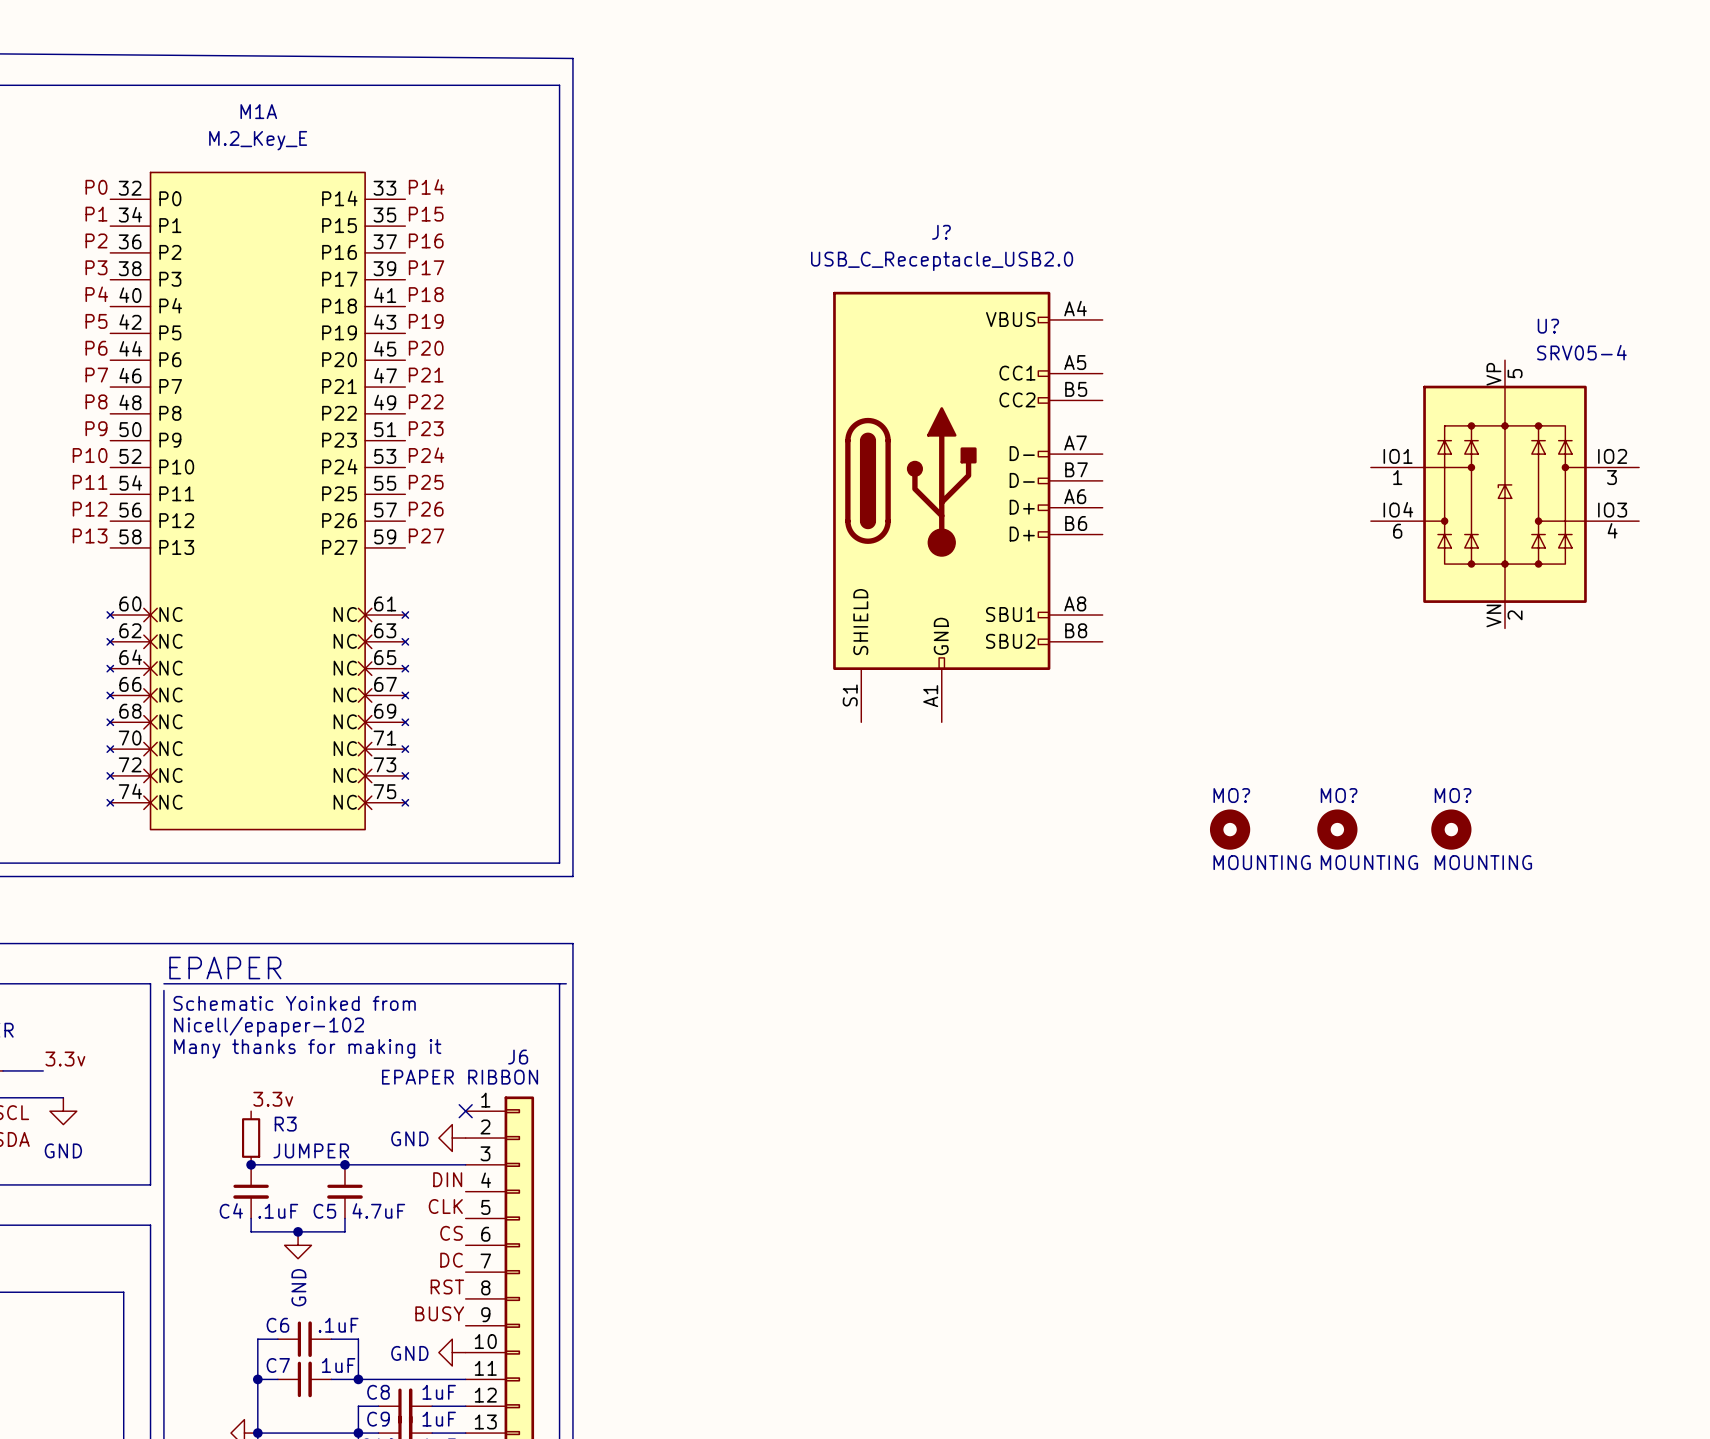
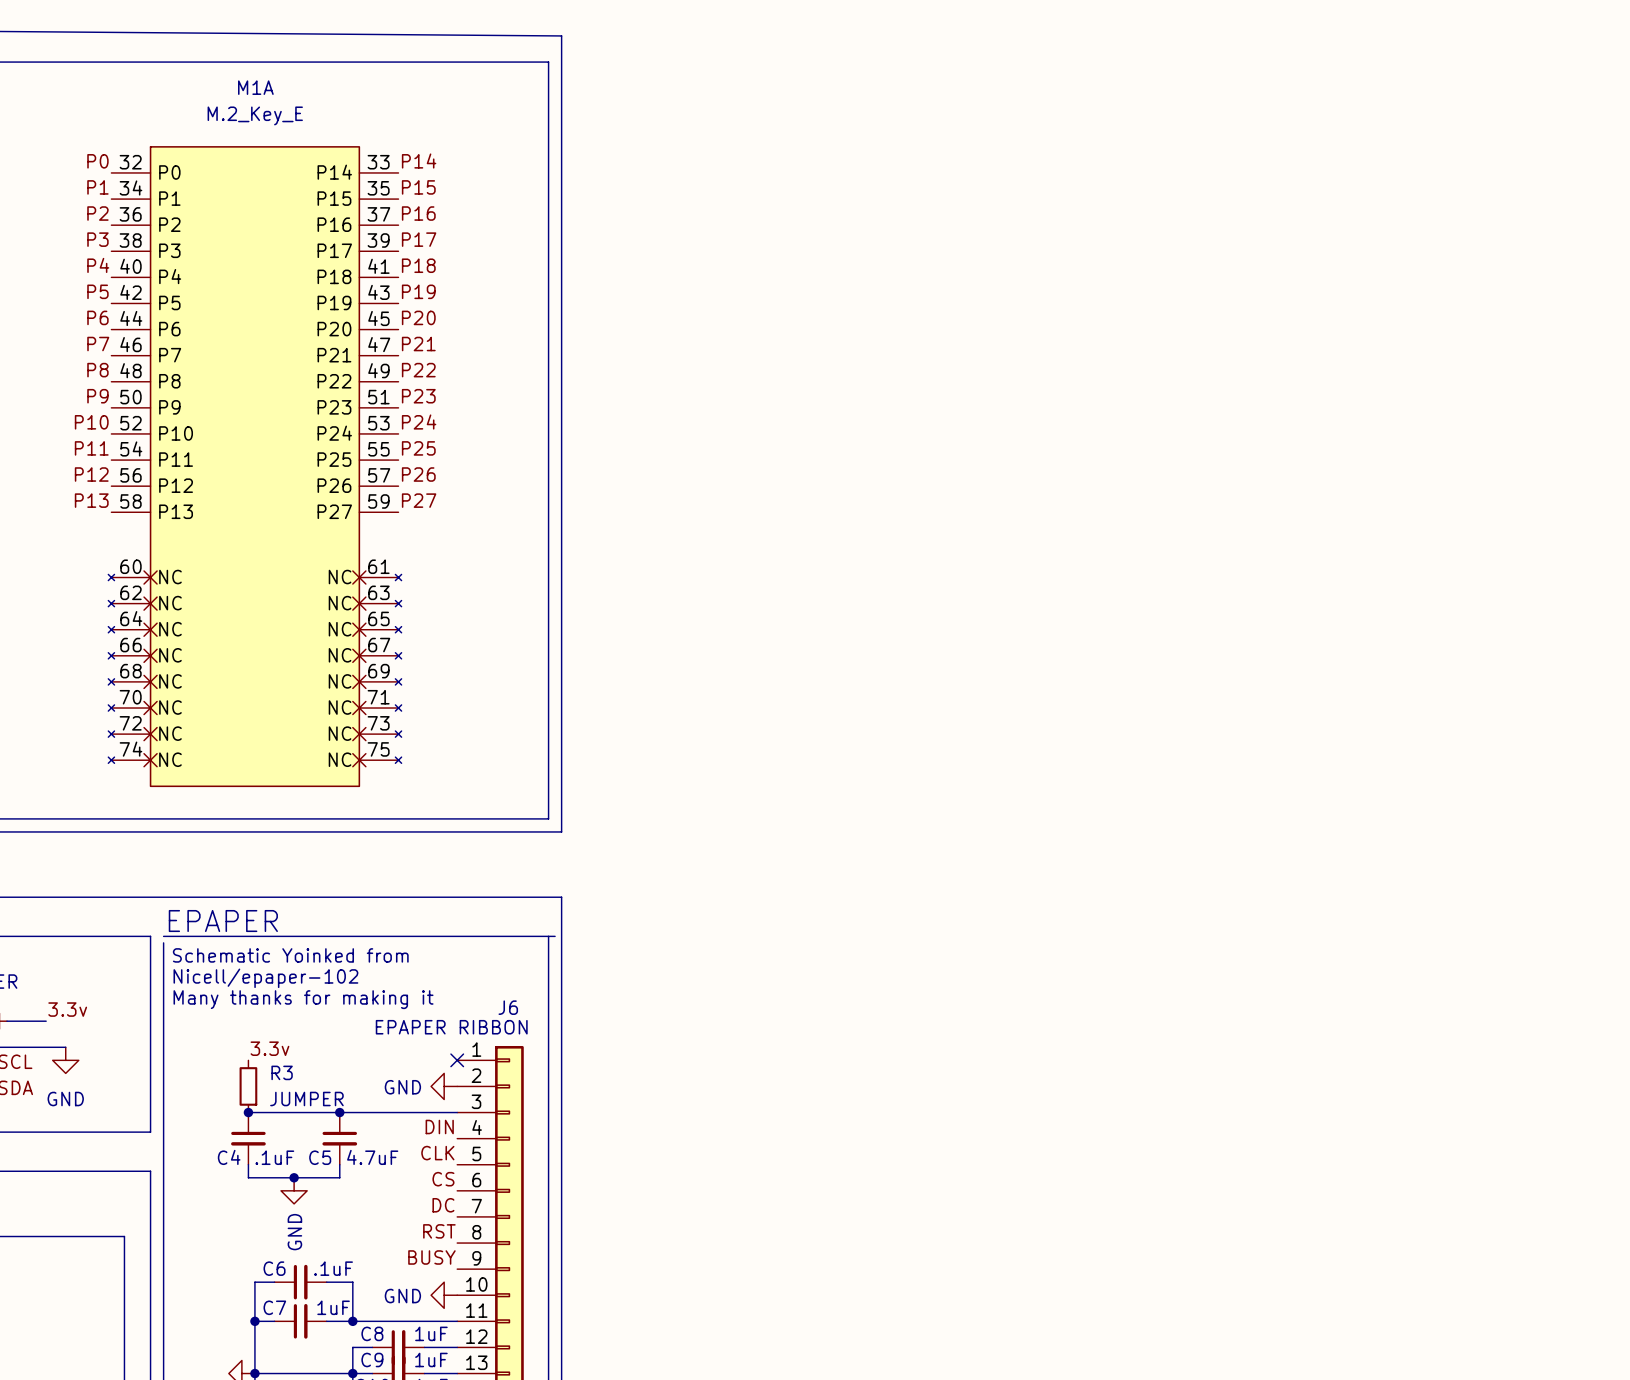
U?: SRV05-4 (1505, 494) -> none
J?: USB_C_Receptacle_USB2.0 (967, 507) -> none
MO?: MOUNTING (1230, 829) -> none
MO?: MOUNTING (1337, 829) -> none
MO?: MOUNTING (1451, 829) -> none

